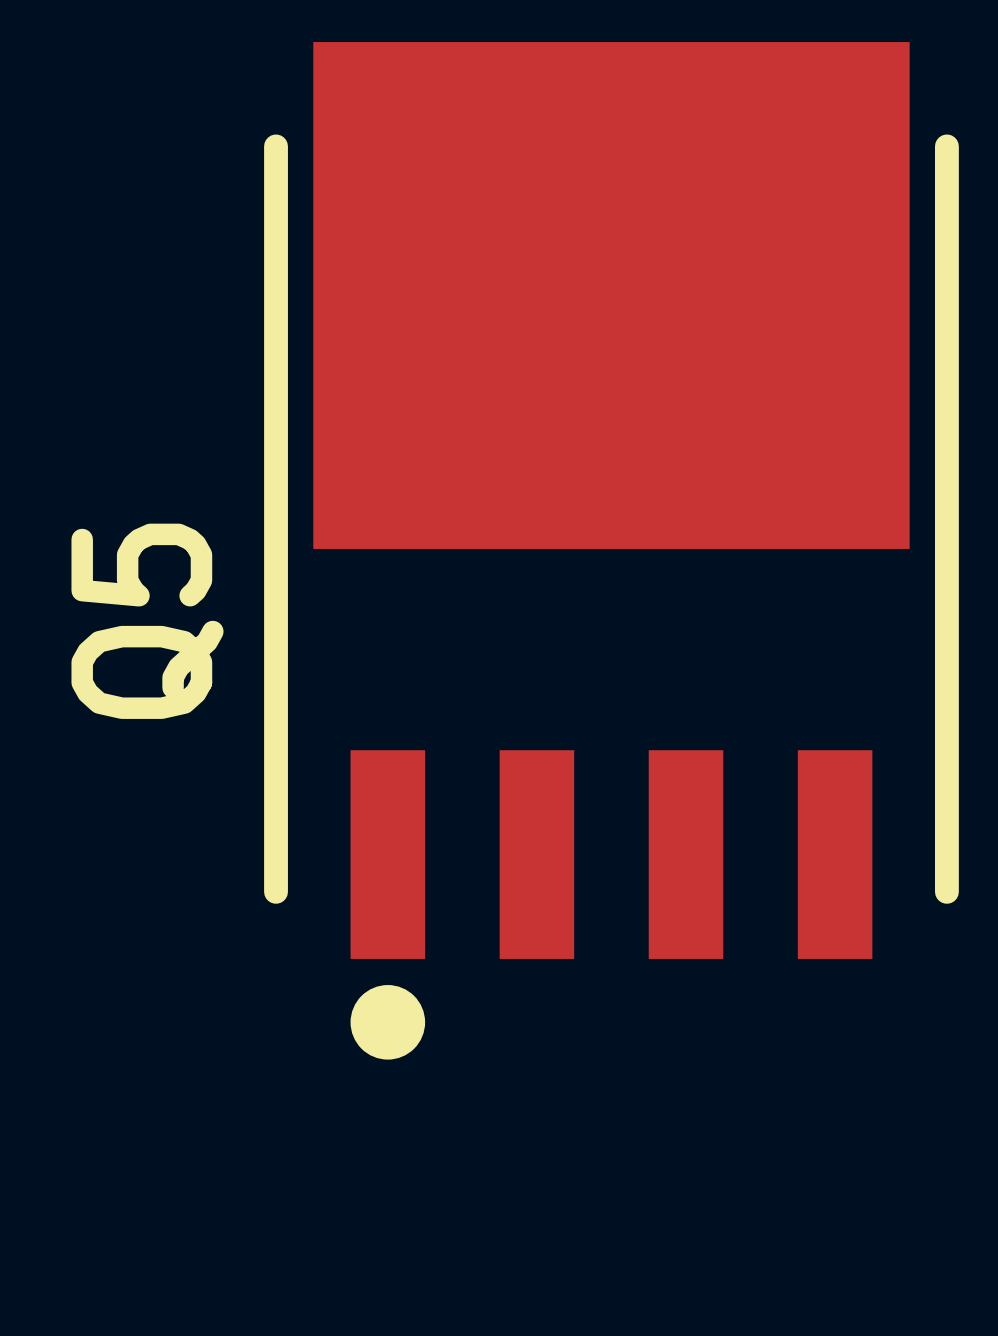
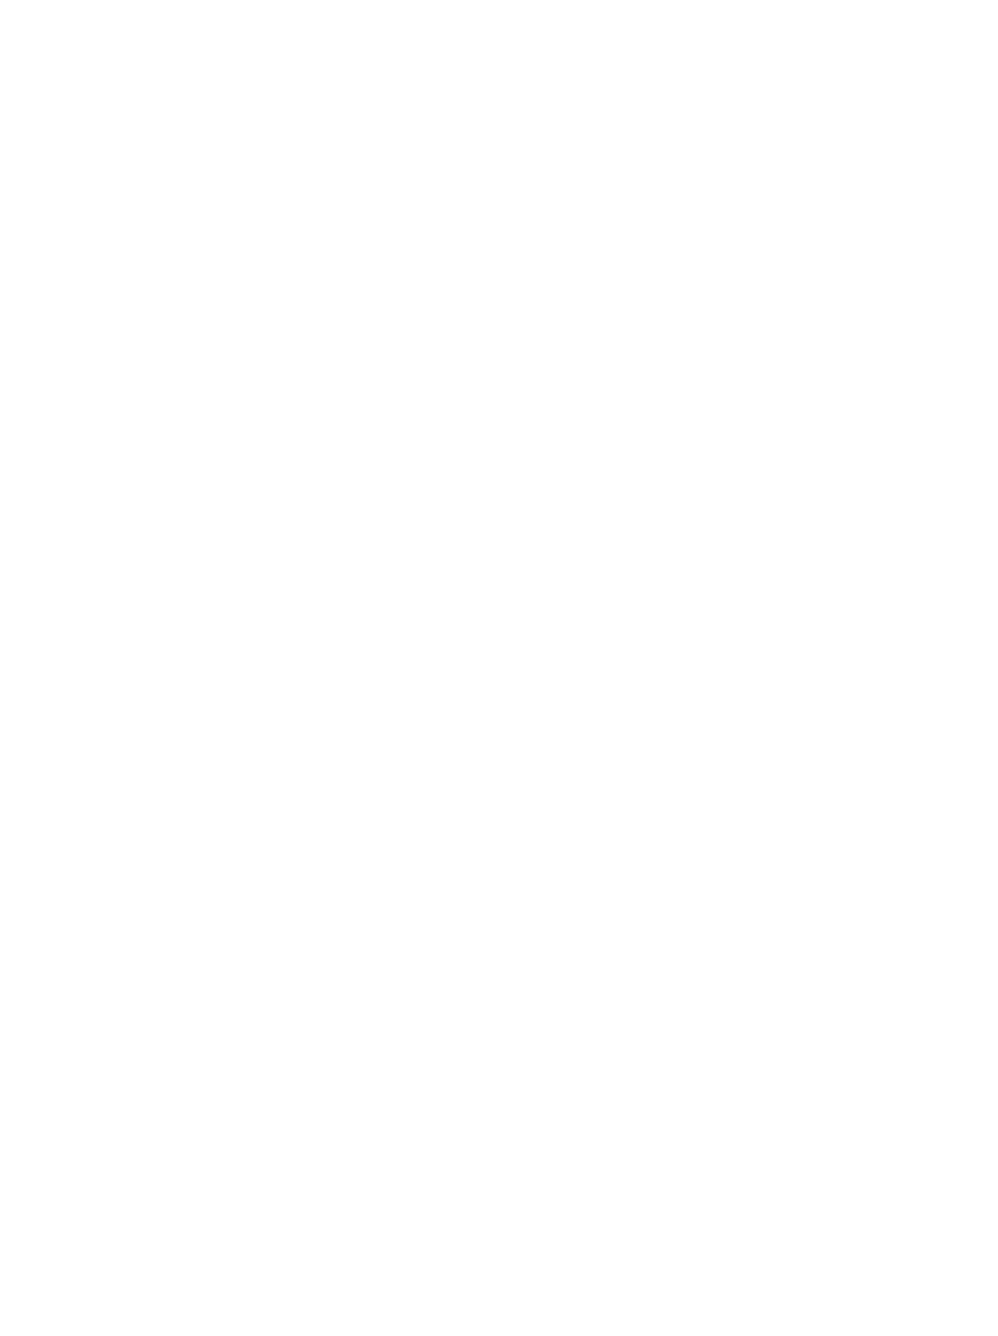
Q5: (611, 550) -> none

